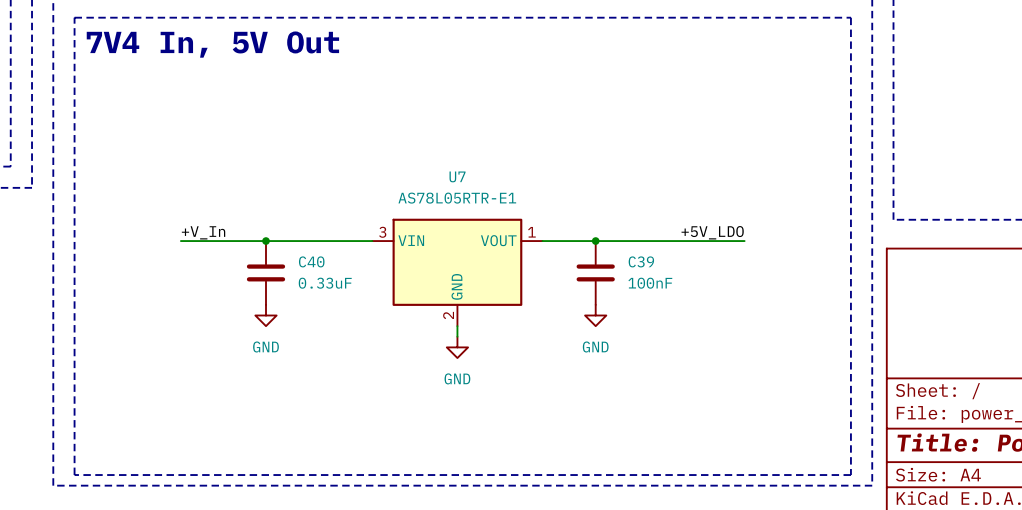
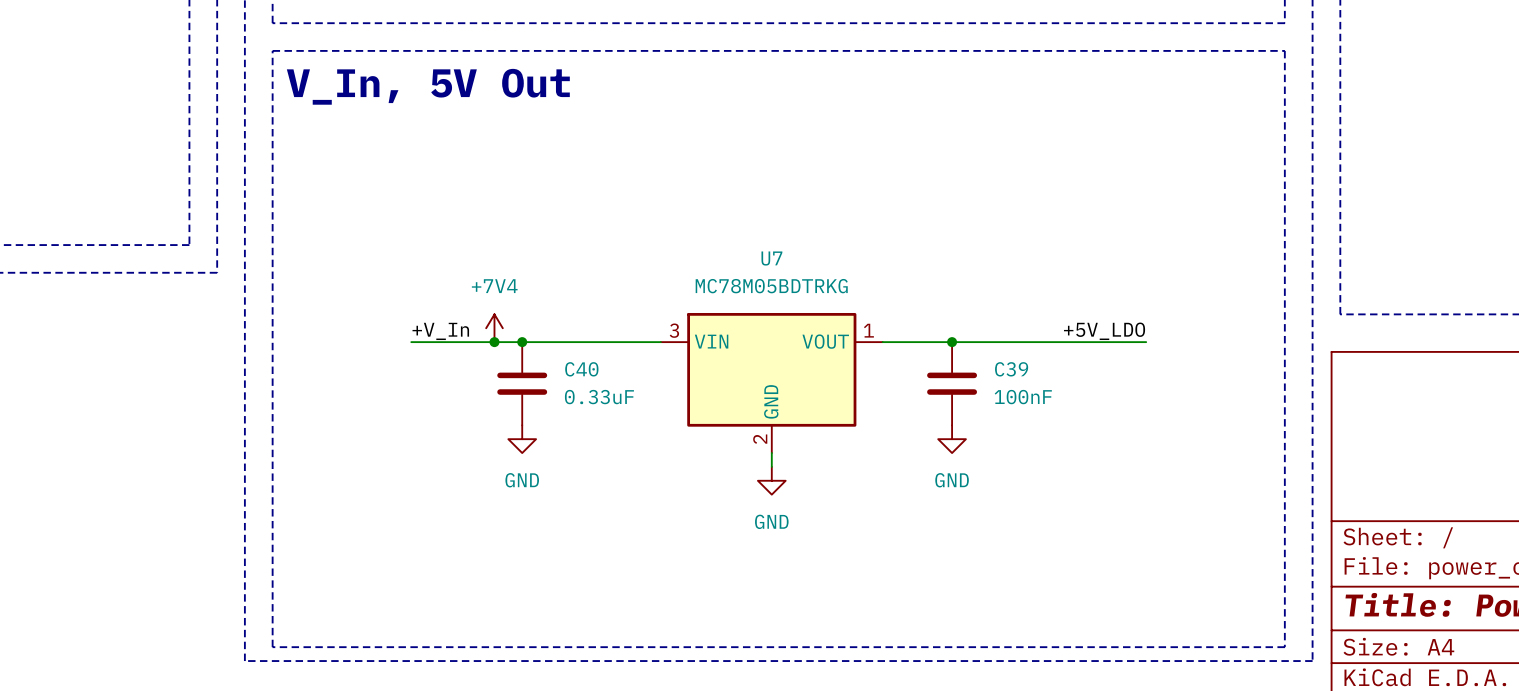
text: 7V4 In, 5V Out (212, 44) -> V_In, 5V Out (428, 86)
U7 value: AS78L05RTR-E1 (457, 198) -> MC78M05BDTRKG (771, 286)
power symbol: none -> +7V4 (494, 328)
junction: none -> (494, 342)

